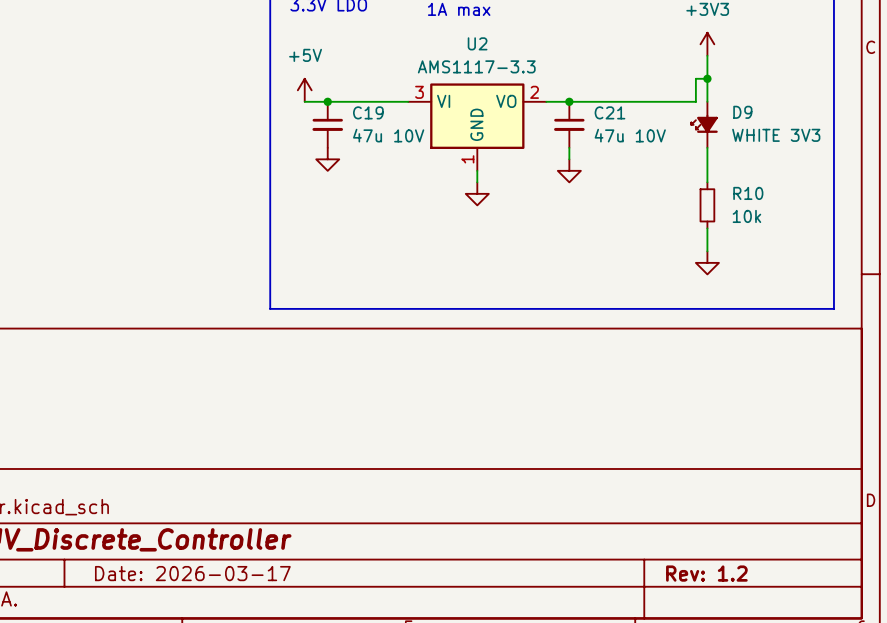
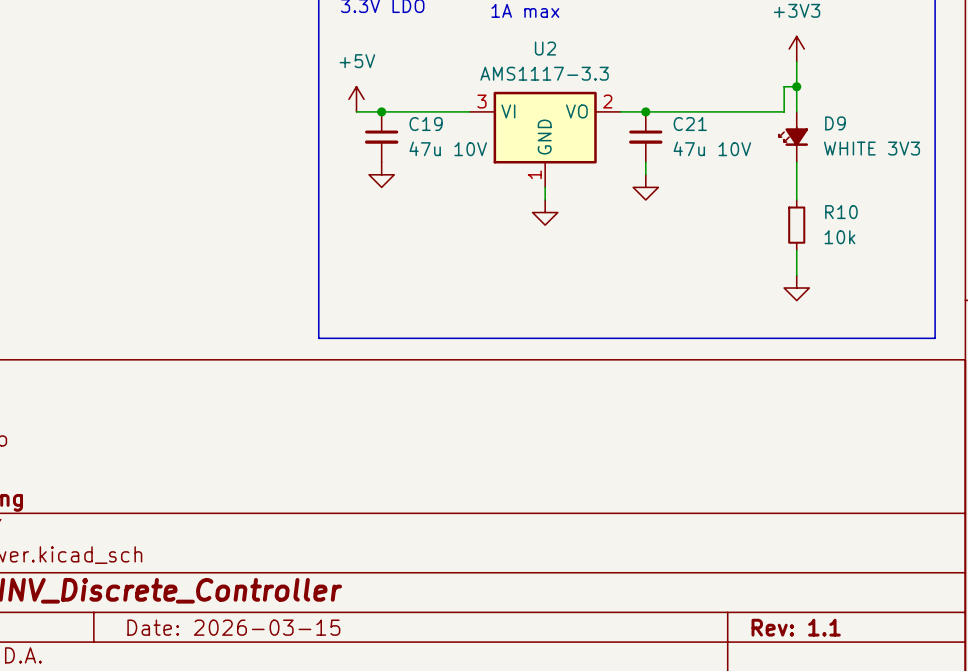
title block: Date: 2026-03-17 (192, 573) -> Date: 2026-03-15 (233, 627)
title block: Rev: 1.2 (706, 573) -> Rev: 1.1 (796, 627)

